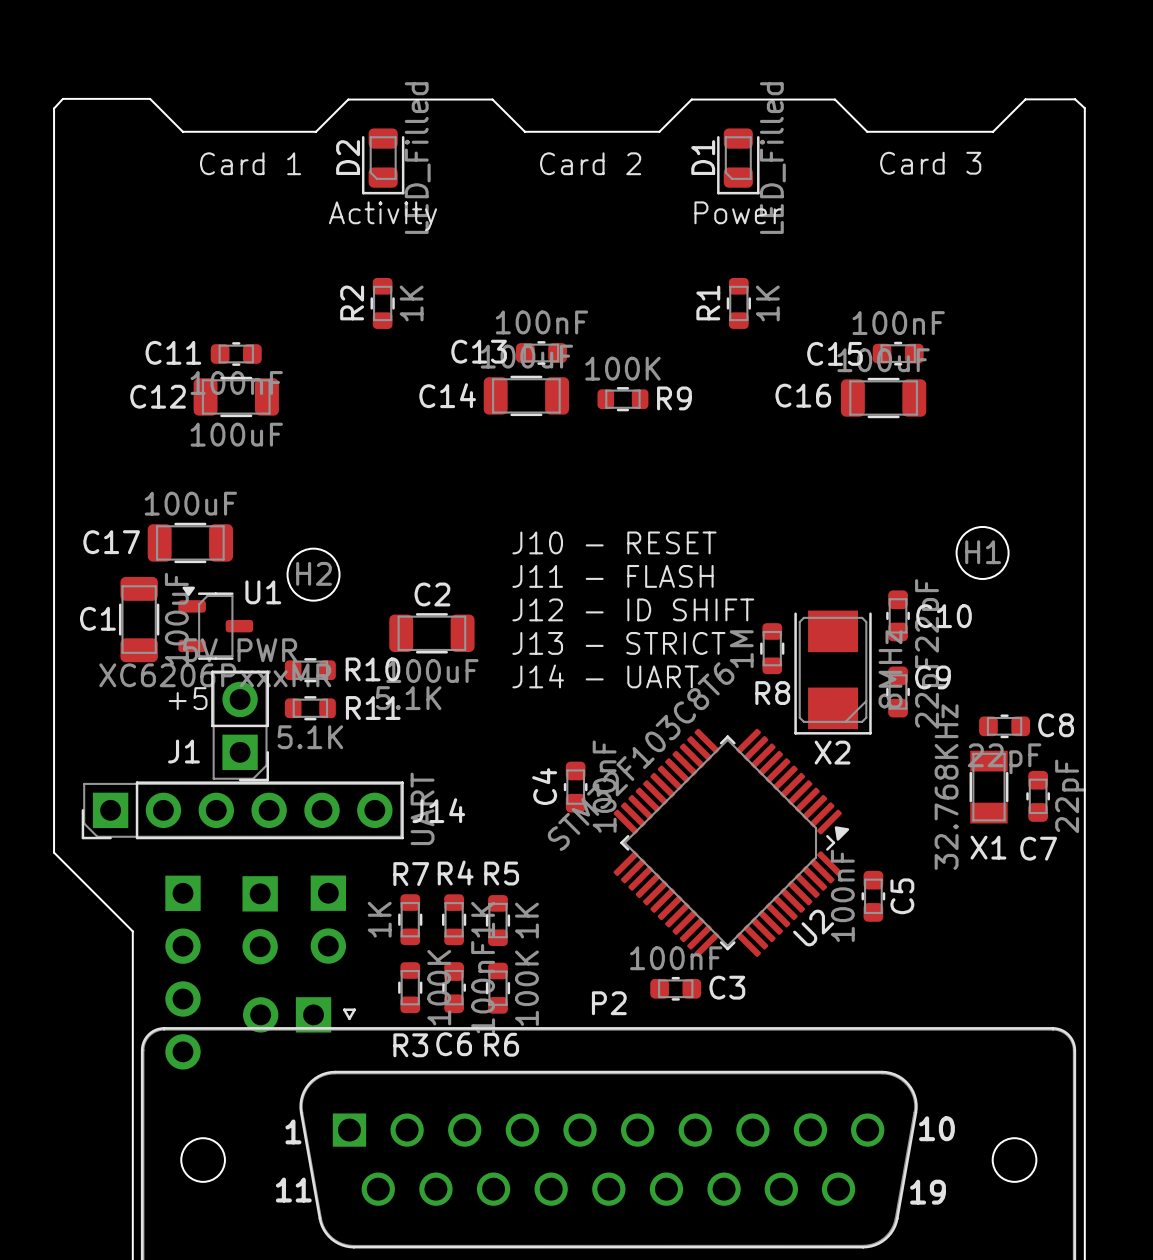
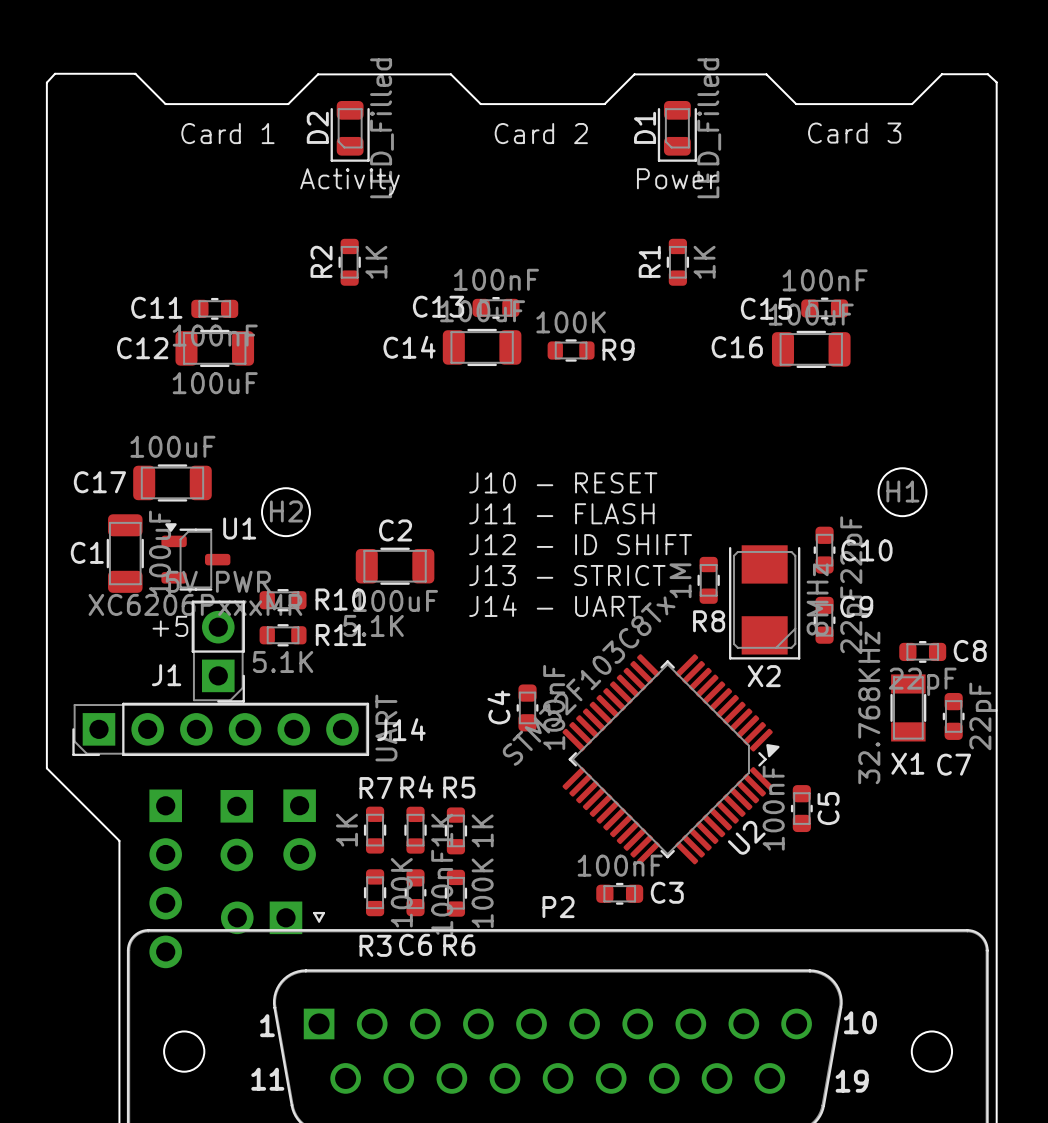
U2 value: STM32F103C8T6 (641, 756) -> STM32F103C8Tx (589, 681)

